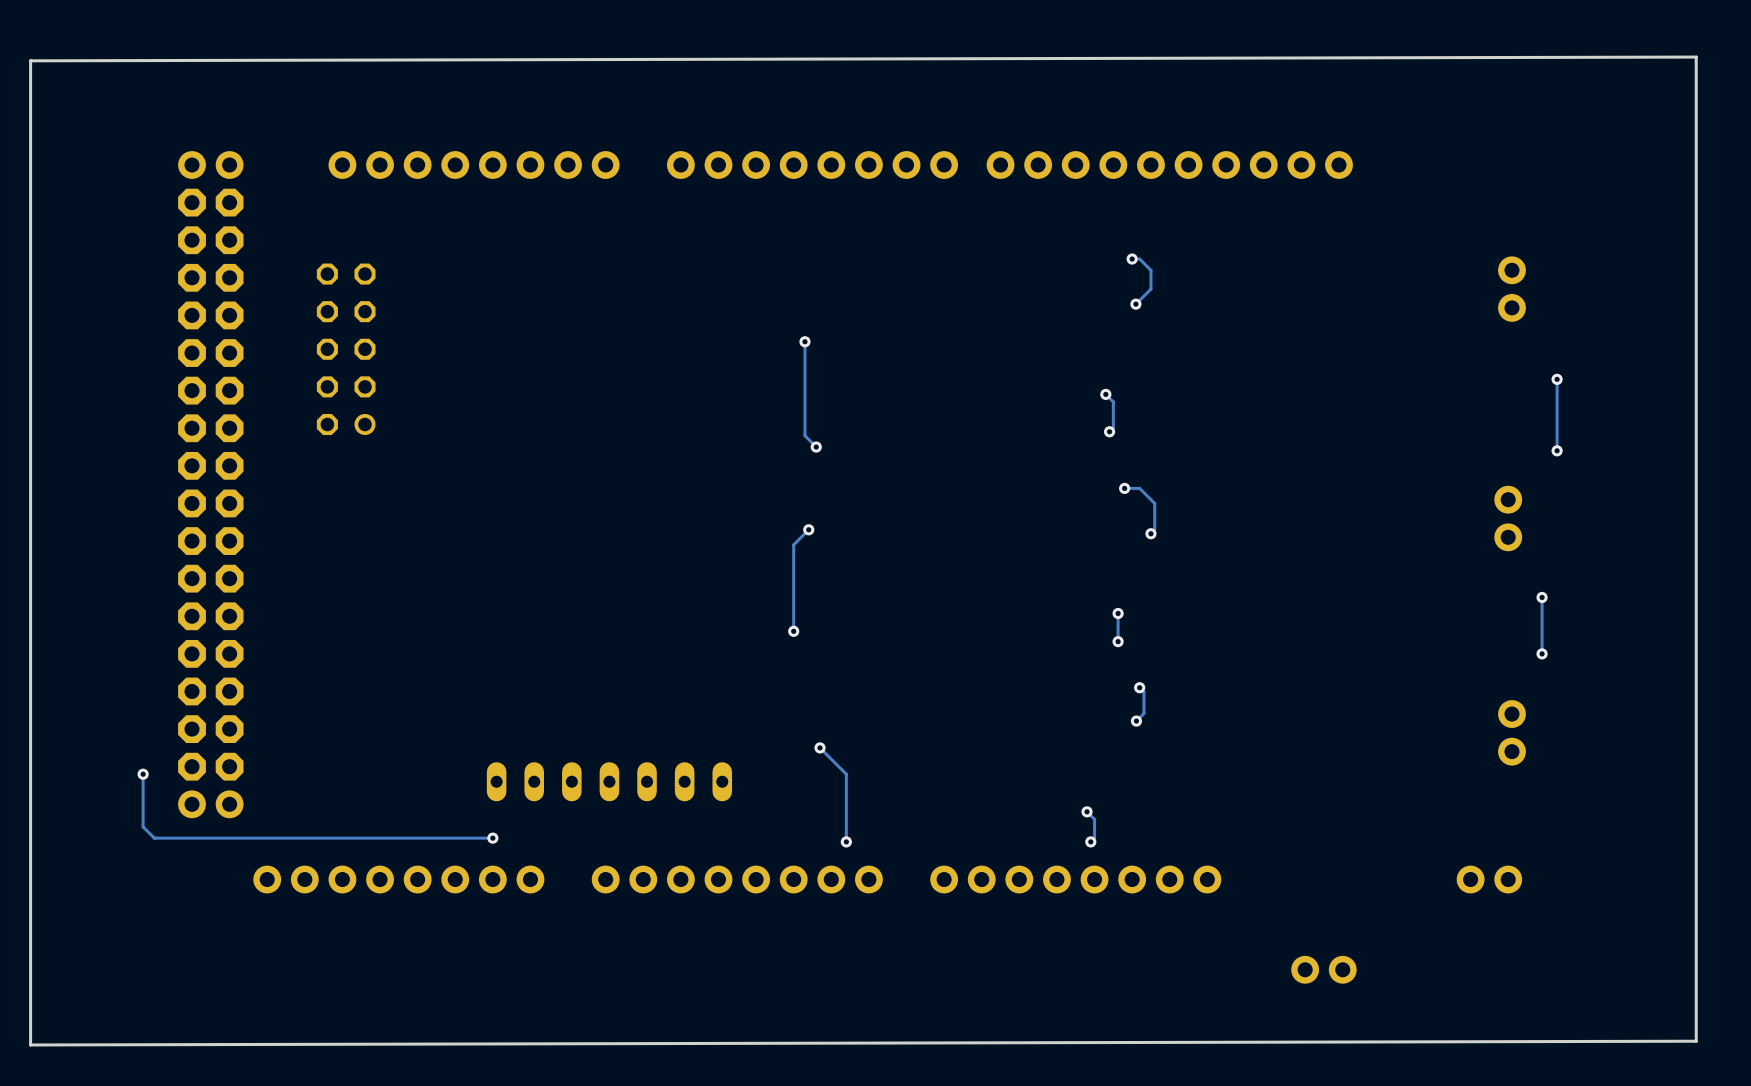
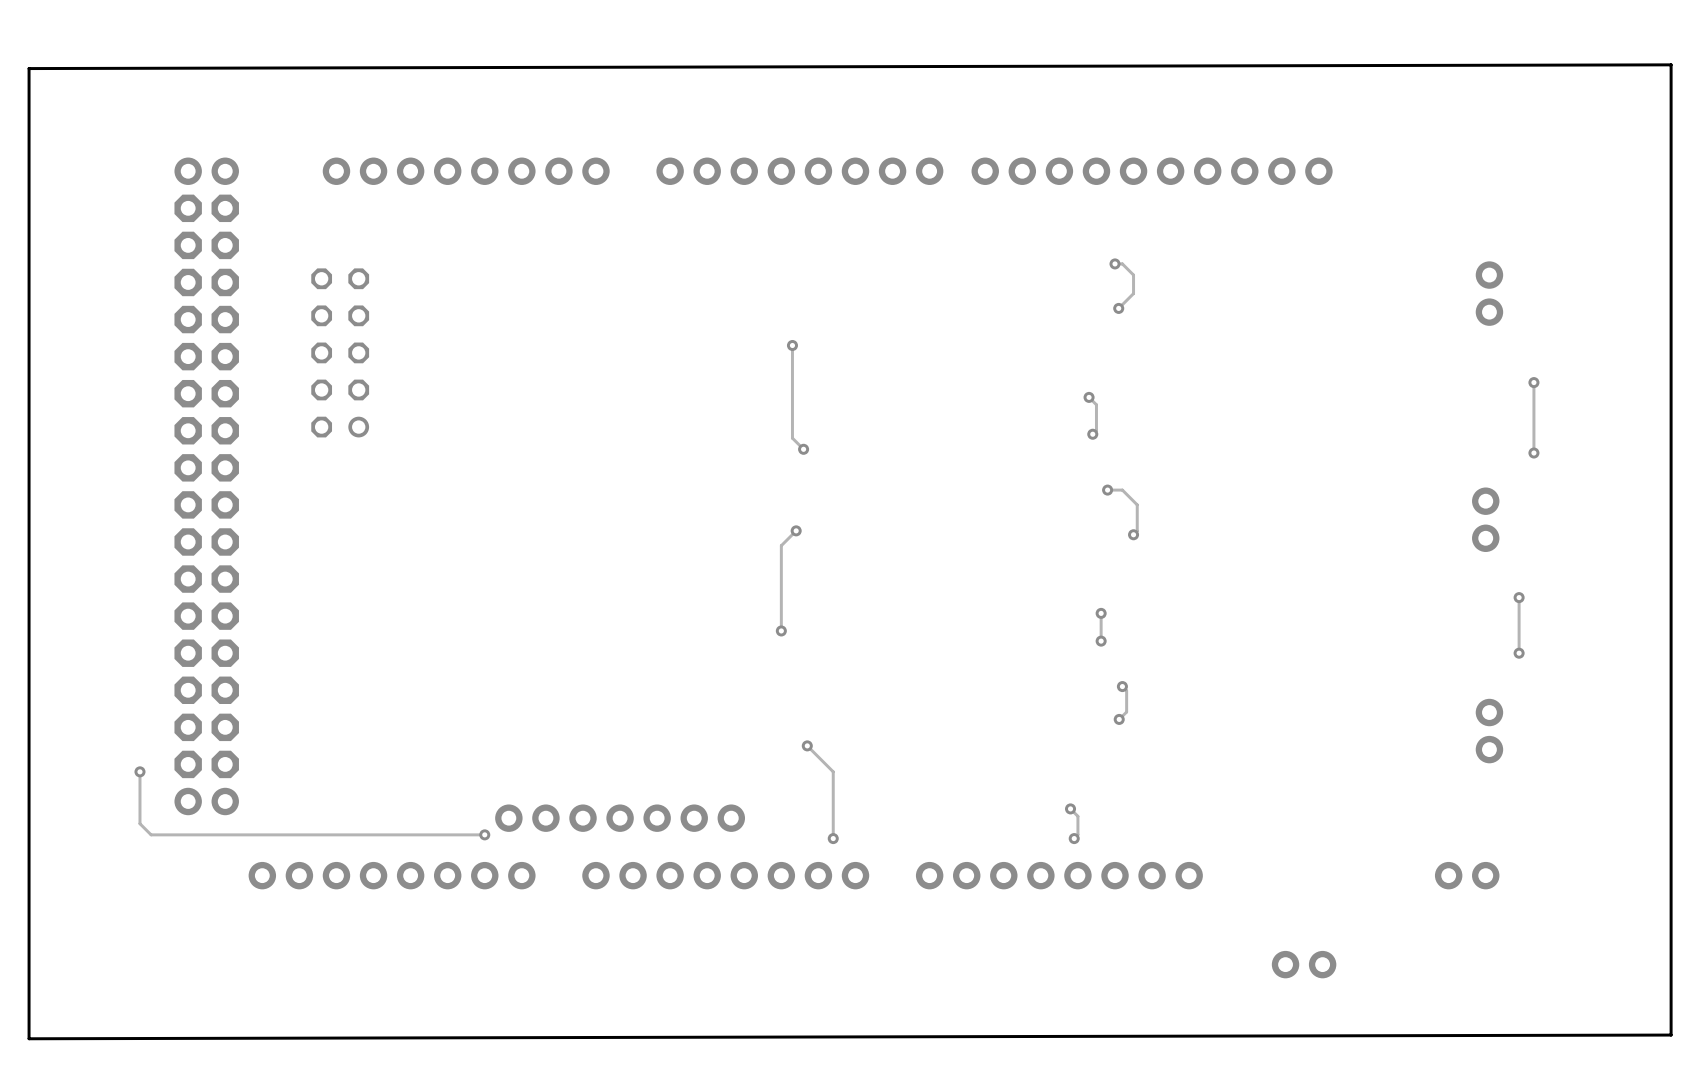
part: (609, 781) -> none
part: none -> (620, 818)

